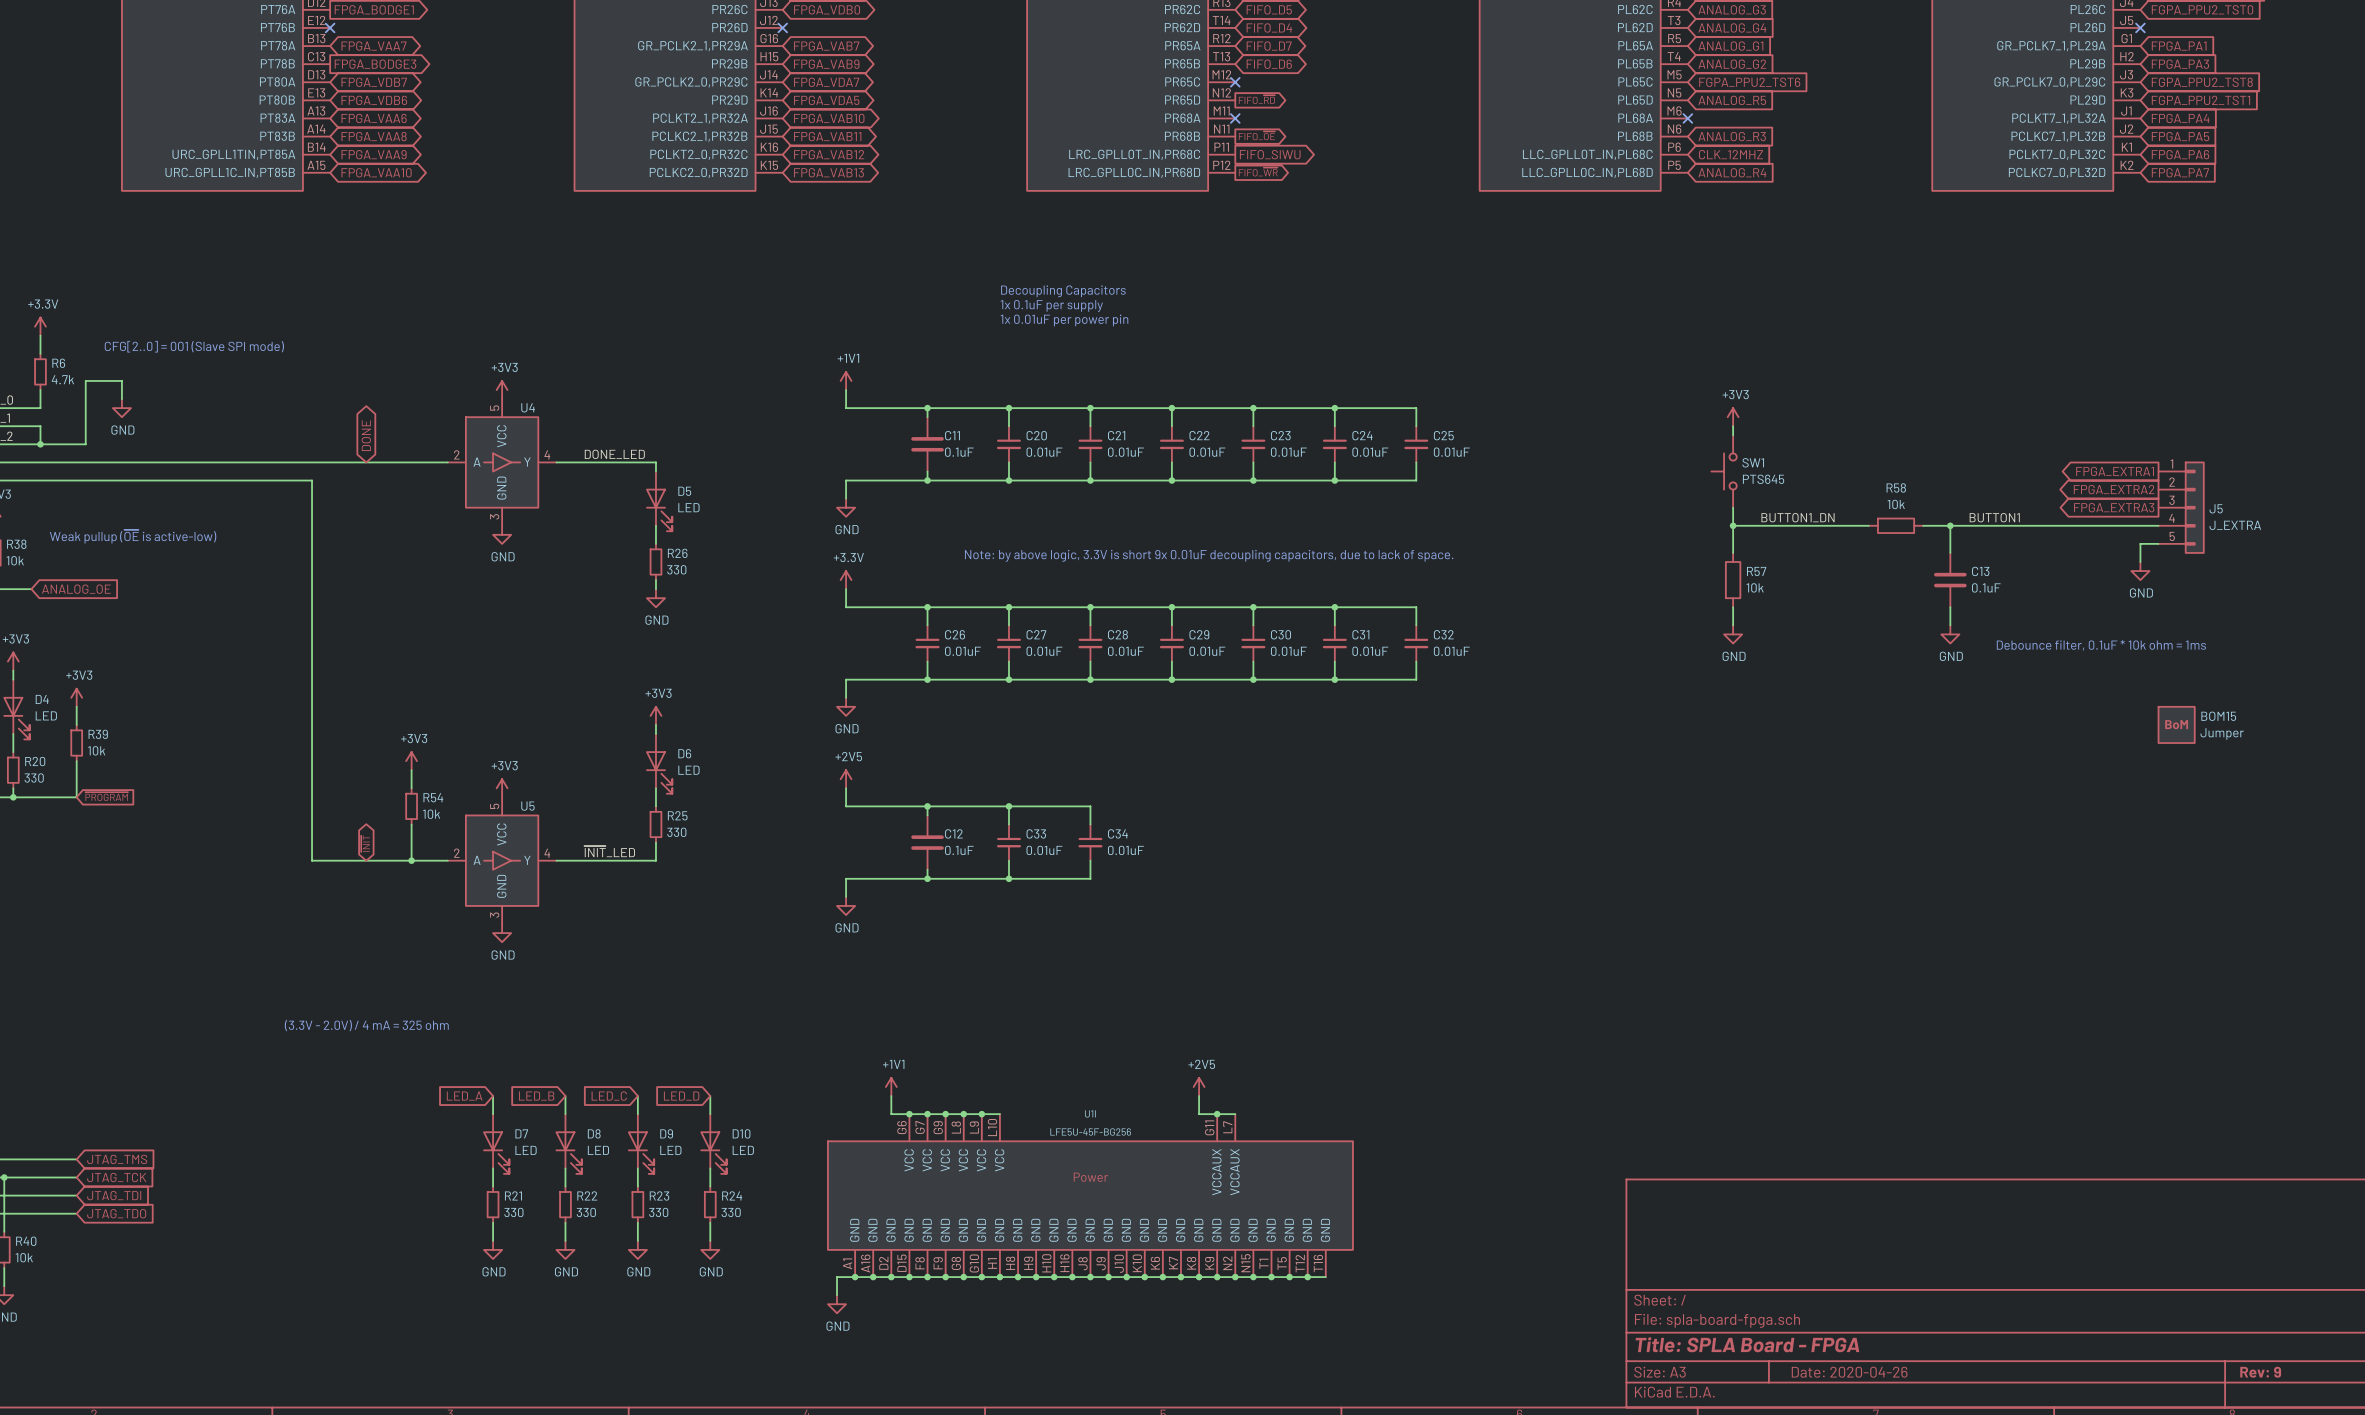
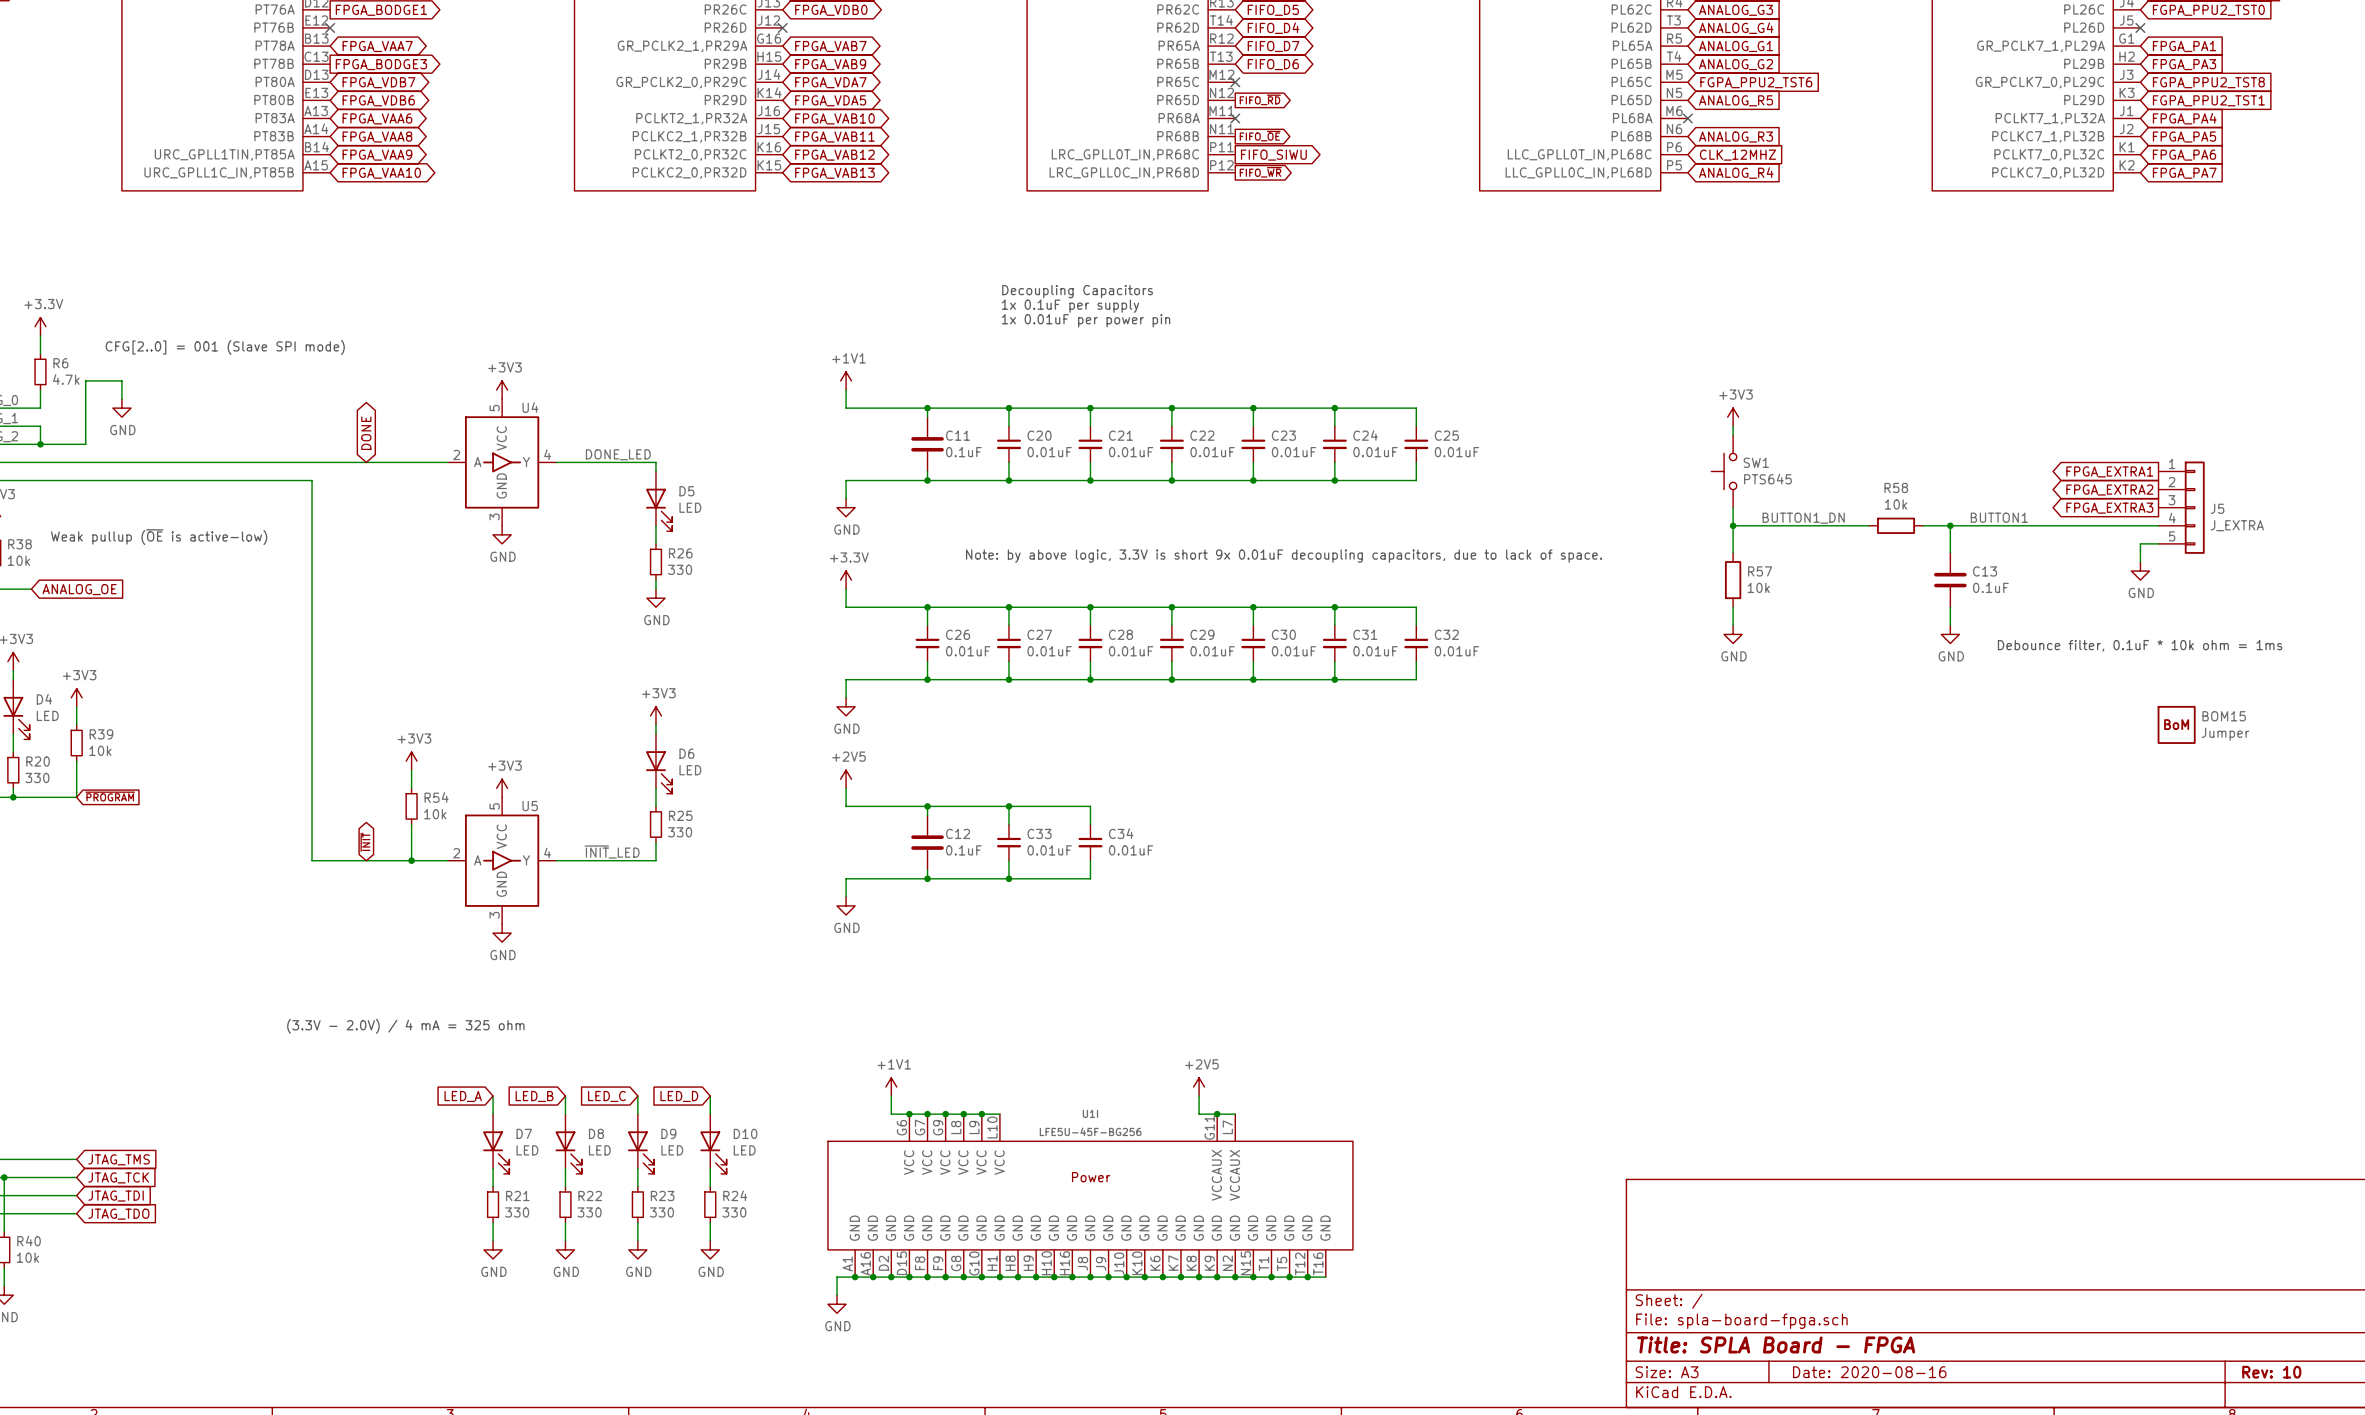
title block: Date: 2020-04-26 (1849, 1372) -> Date: 2020-08-16 (1869, 1372)
title block: Rev: 9 (2260, 1372) -> Rev: 10 (2271, 1372)

